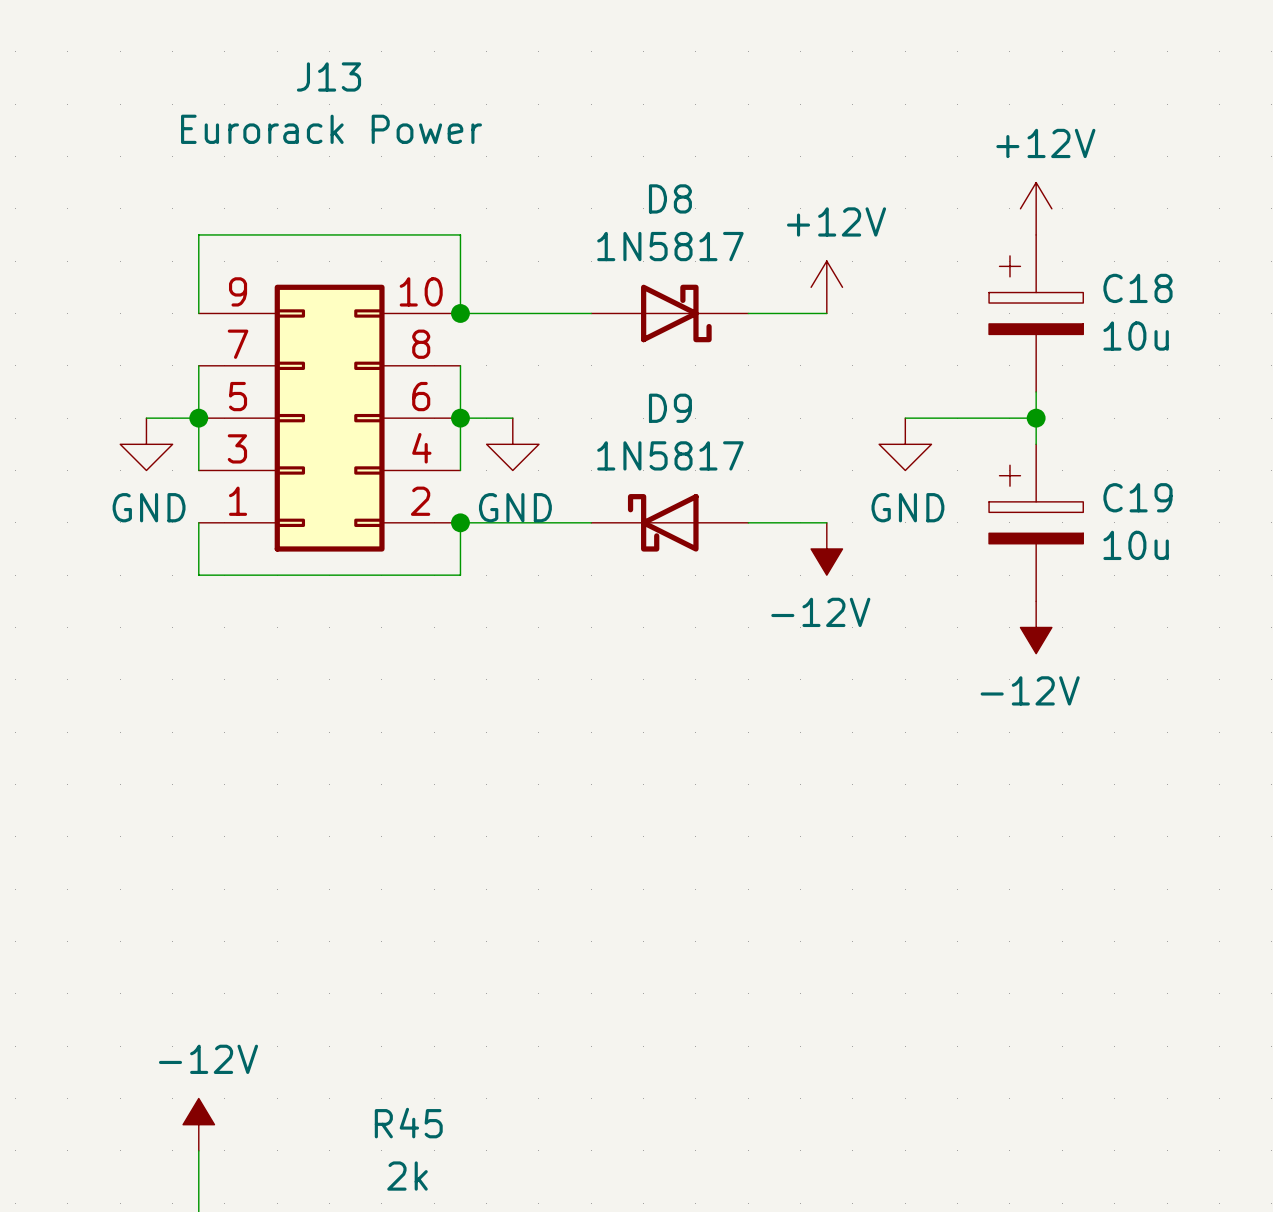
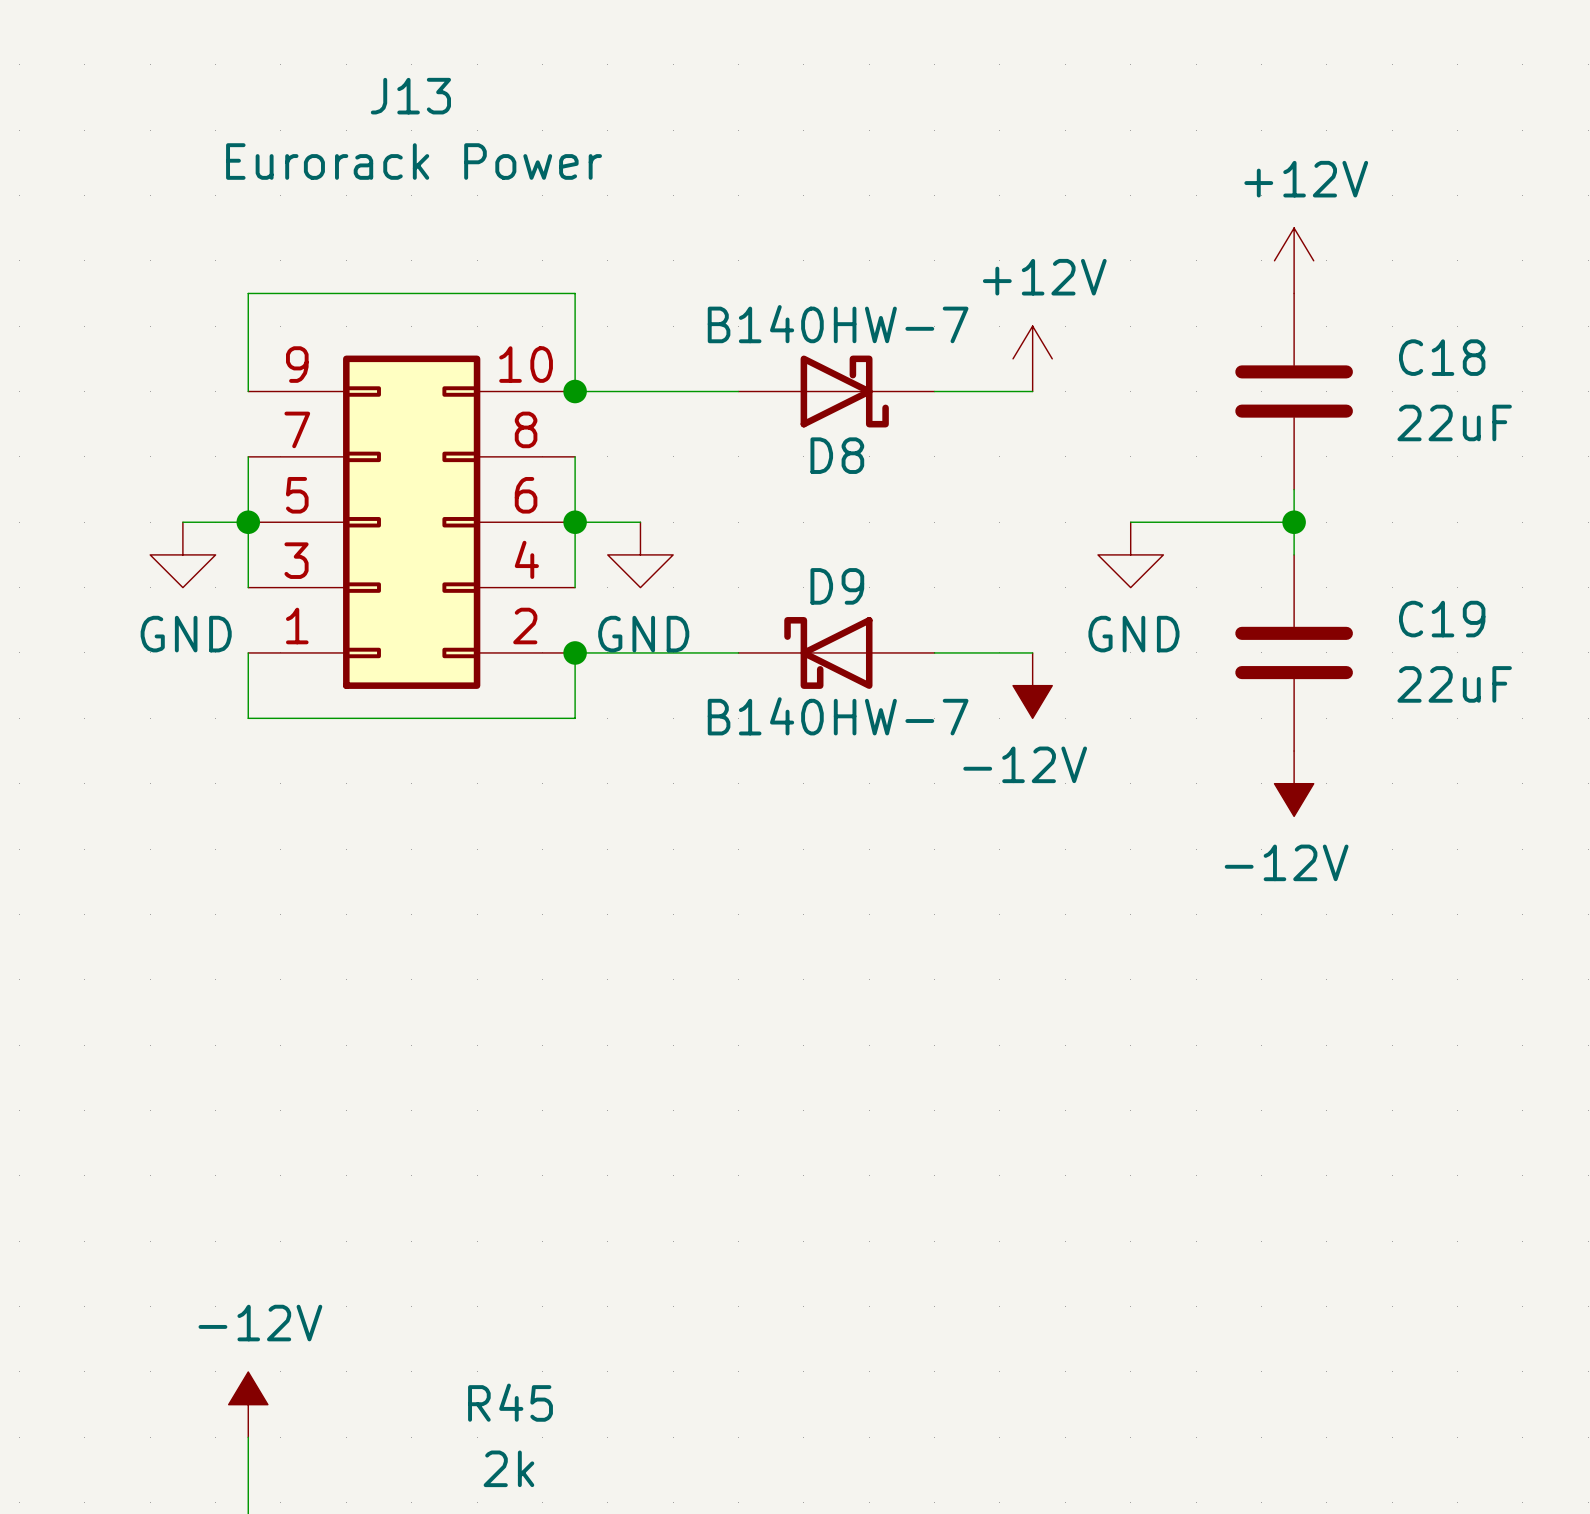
D8 name position: D8 (670, 198) -> D8 (837, 455)
C18 symbol: [989, 234, 1084, 392] -> [1235, 293, 1353, 490]
D8 value: 1N5817 (670, 246) -> B140HW-7 (838, 324)
C18 value: 10u (1136, 336) -> 22uF (1454, 422)
D9 name position: D9 (670, 408) -> D9 (837, 586)
C19 symbol: [989, 444, 1084, 602] -> [1235, 554, 1353, 752]
D9 value: 1N5817 (670, 455) -> B140HW-7 (838, 716)
C19 value: 10u (1136, 545) -> 22uF (1454, 684)

